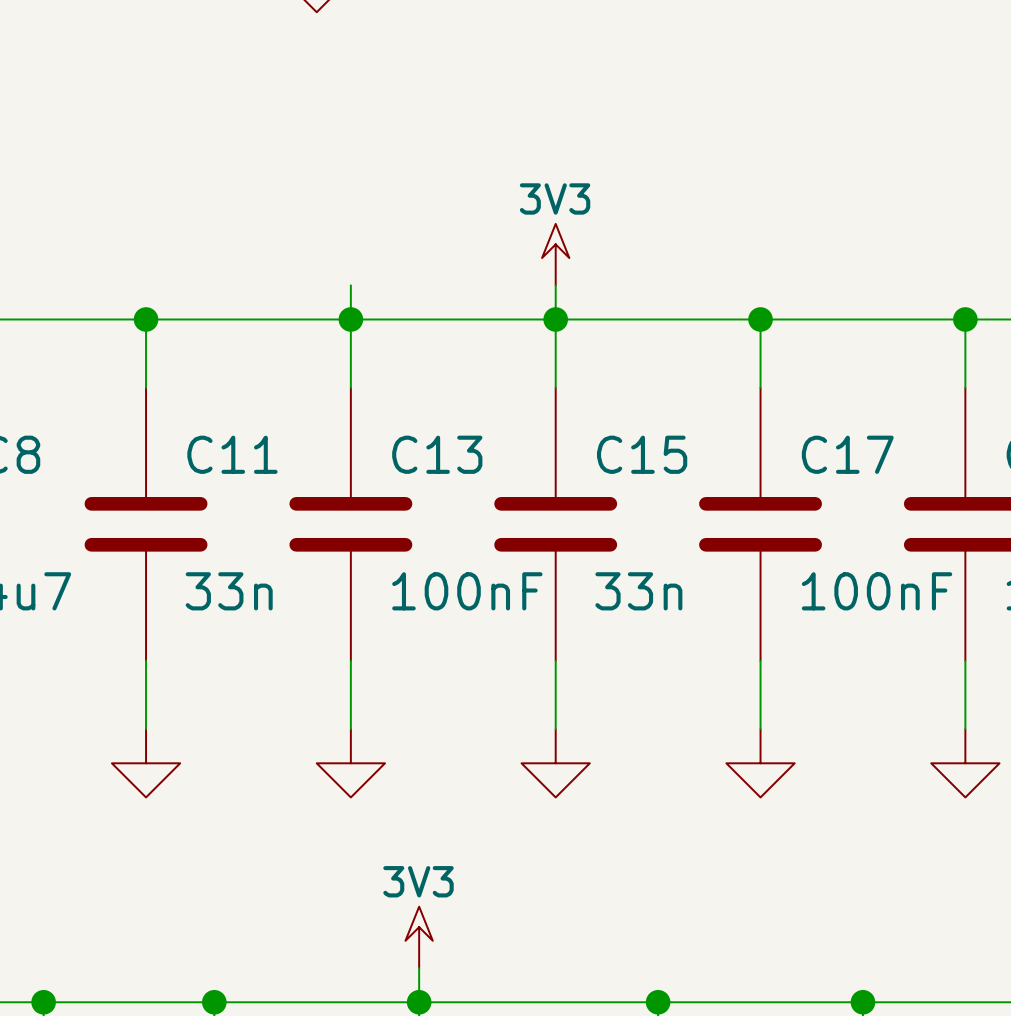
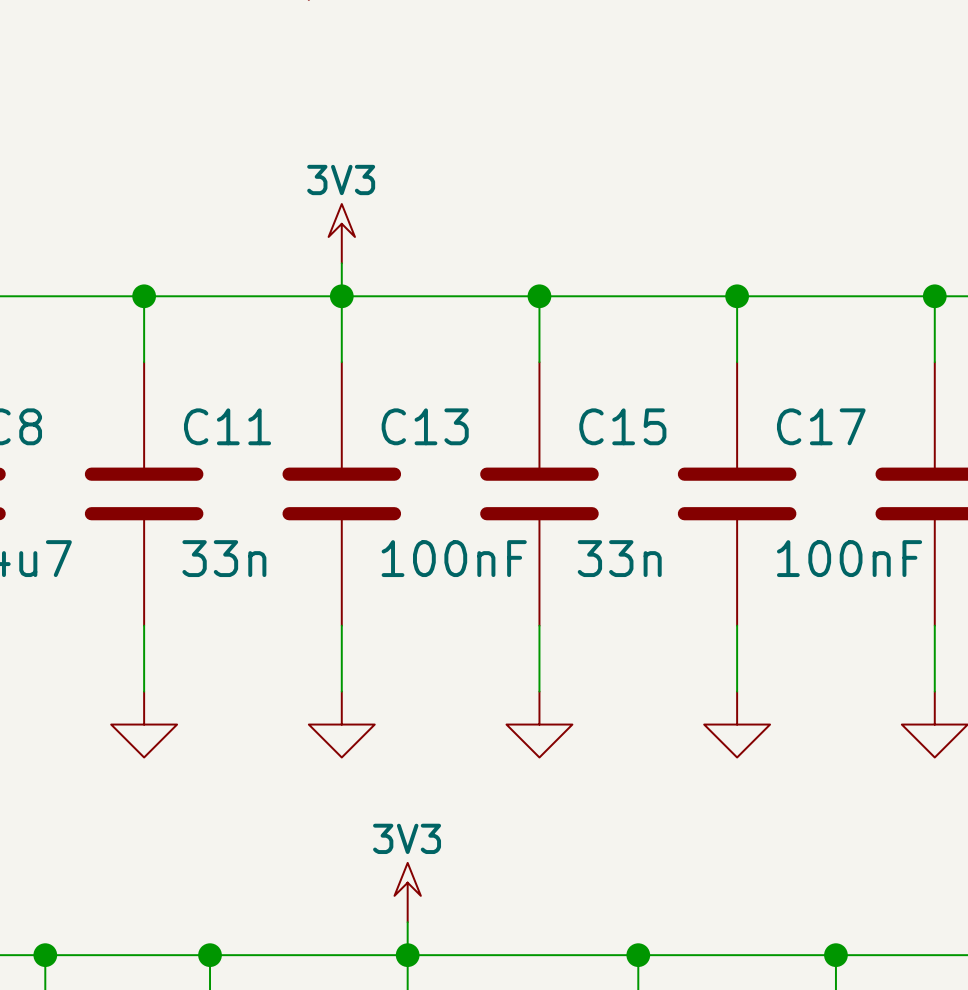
power symbol position: 3V3 (555, 254) -> 3V3 (341, 233)
wire: (555, 285) (555, 319) -> none

